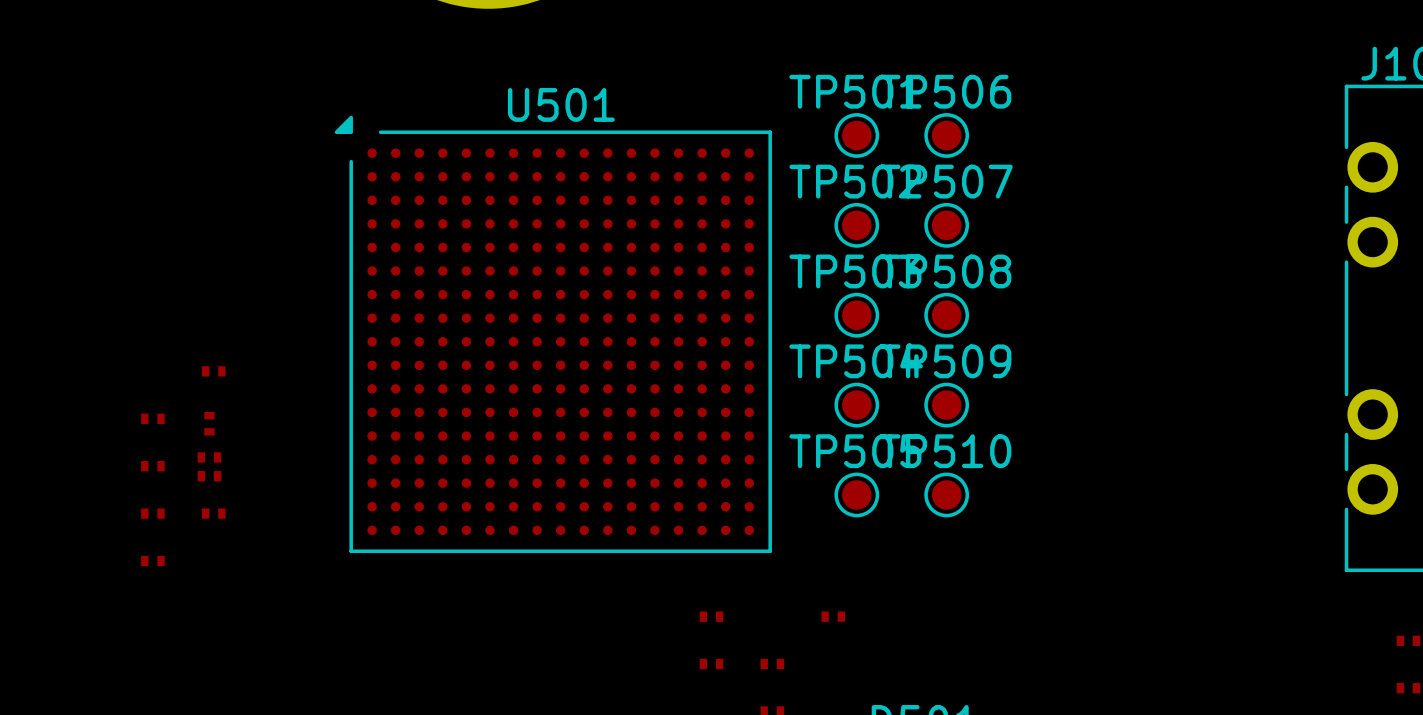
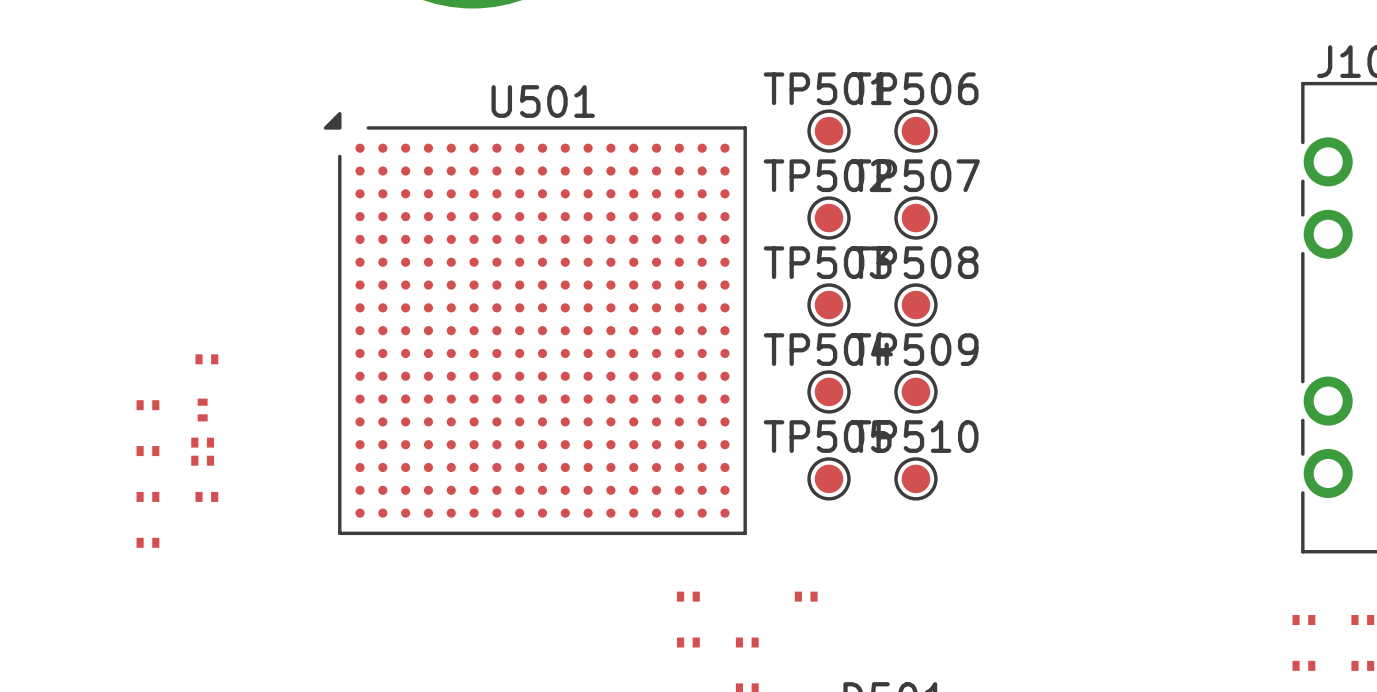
part: none -> (1303, 620)
part: none -> (1303, 665)

